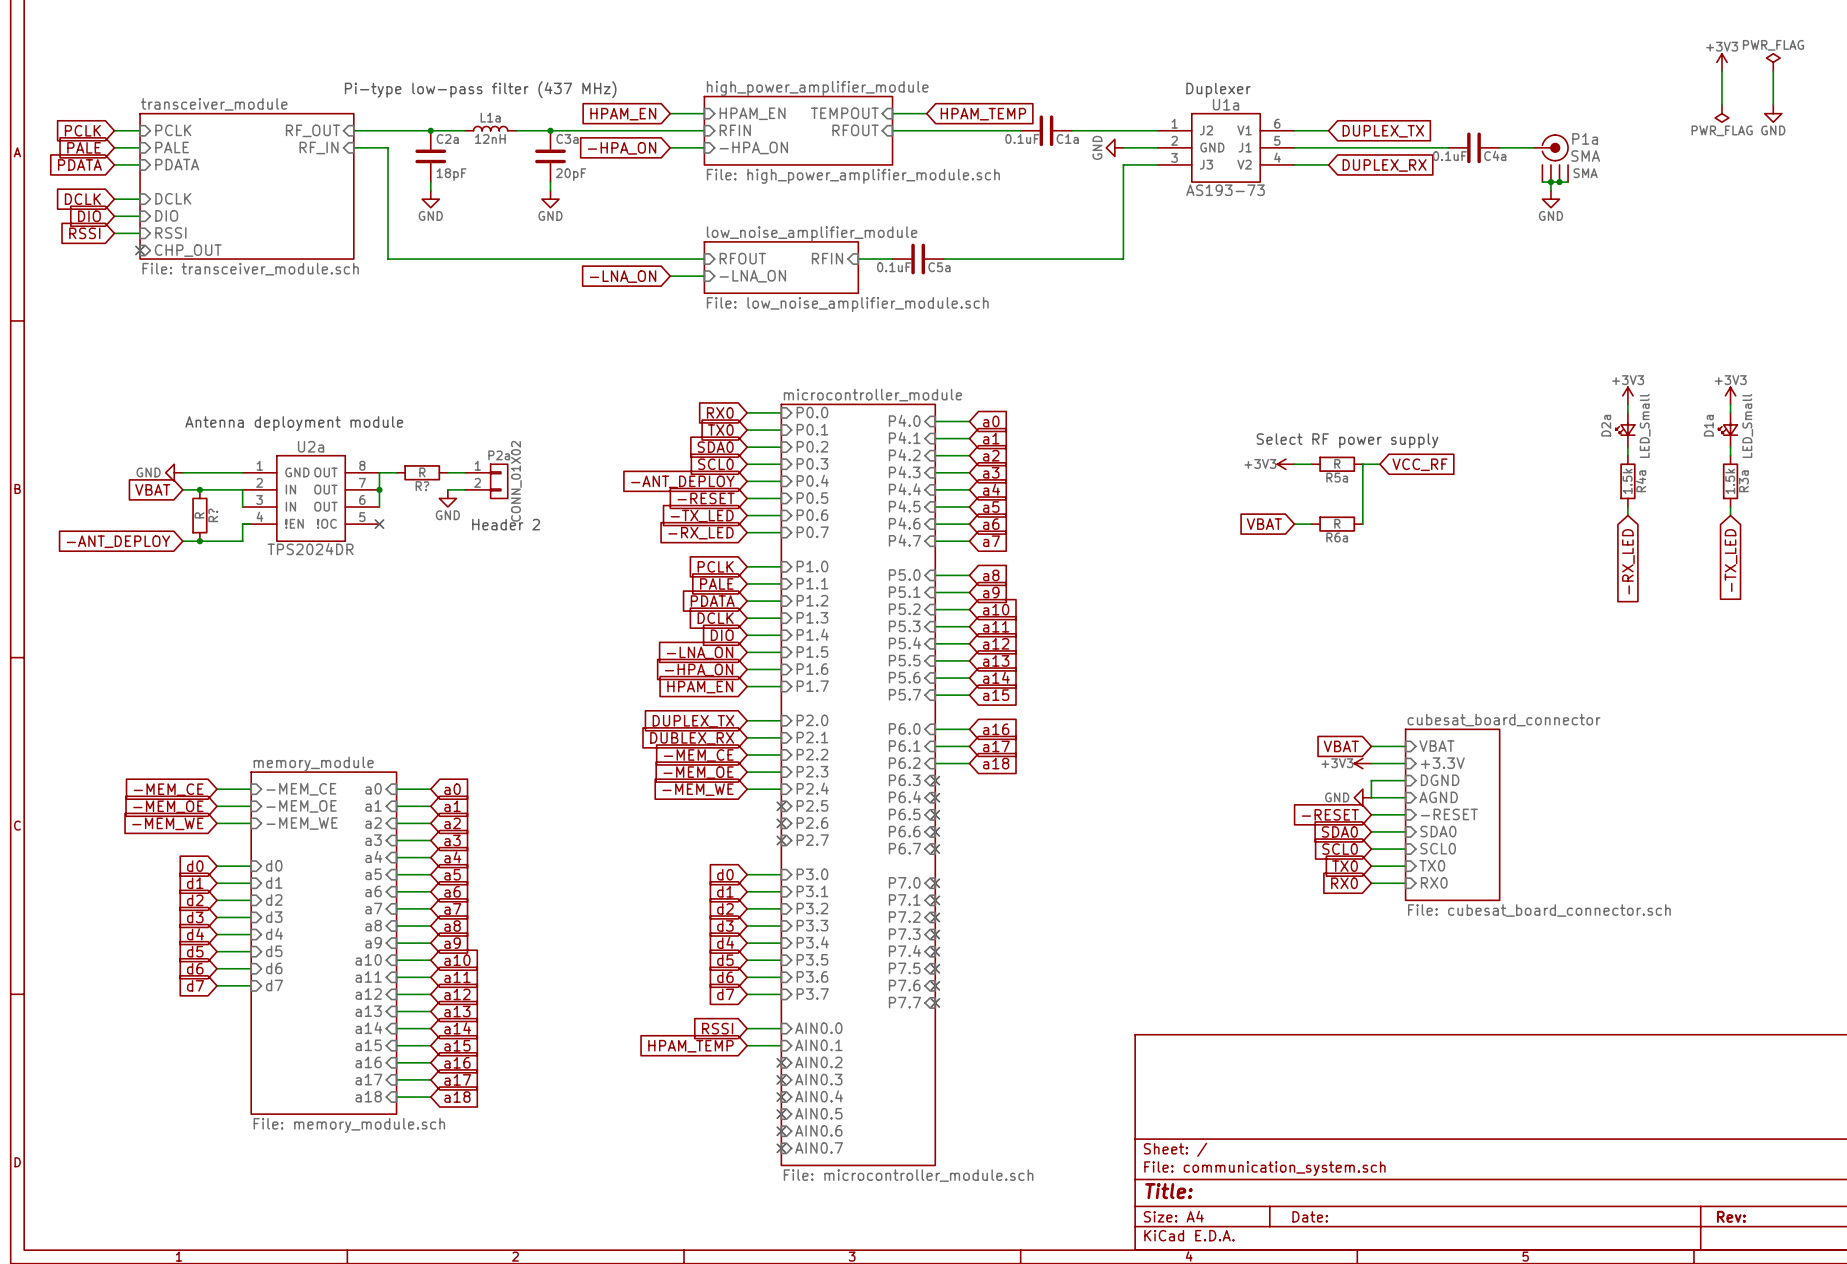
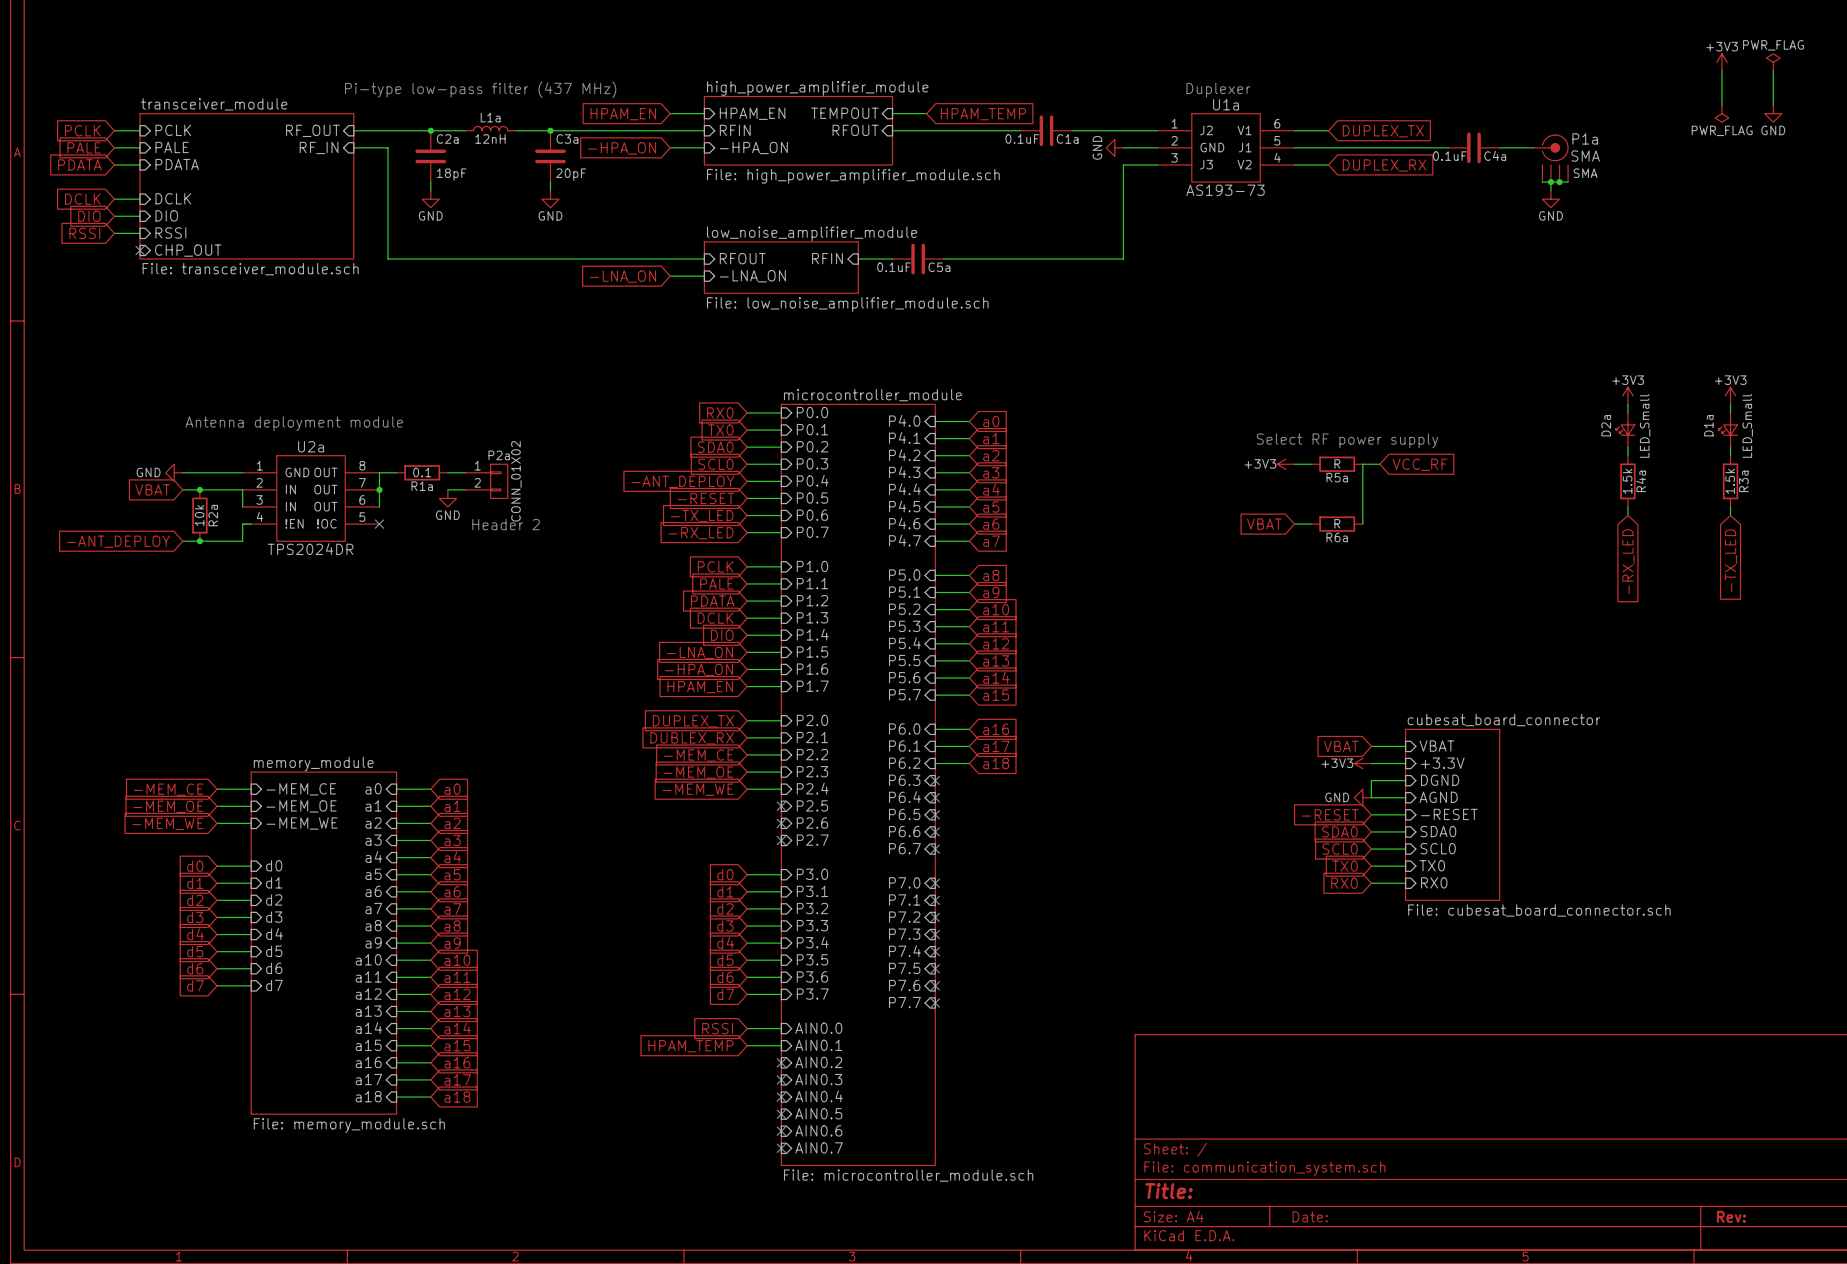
R? value: R (422, 472) -> 0.1 (422, 472)
R? name: R? (422, 486) -> R1a (422, 486)
R? value: R (199, 515) -> 10k (199, 515)
R? name: R? (213, 515) -> R2a (213, 515)

